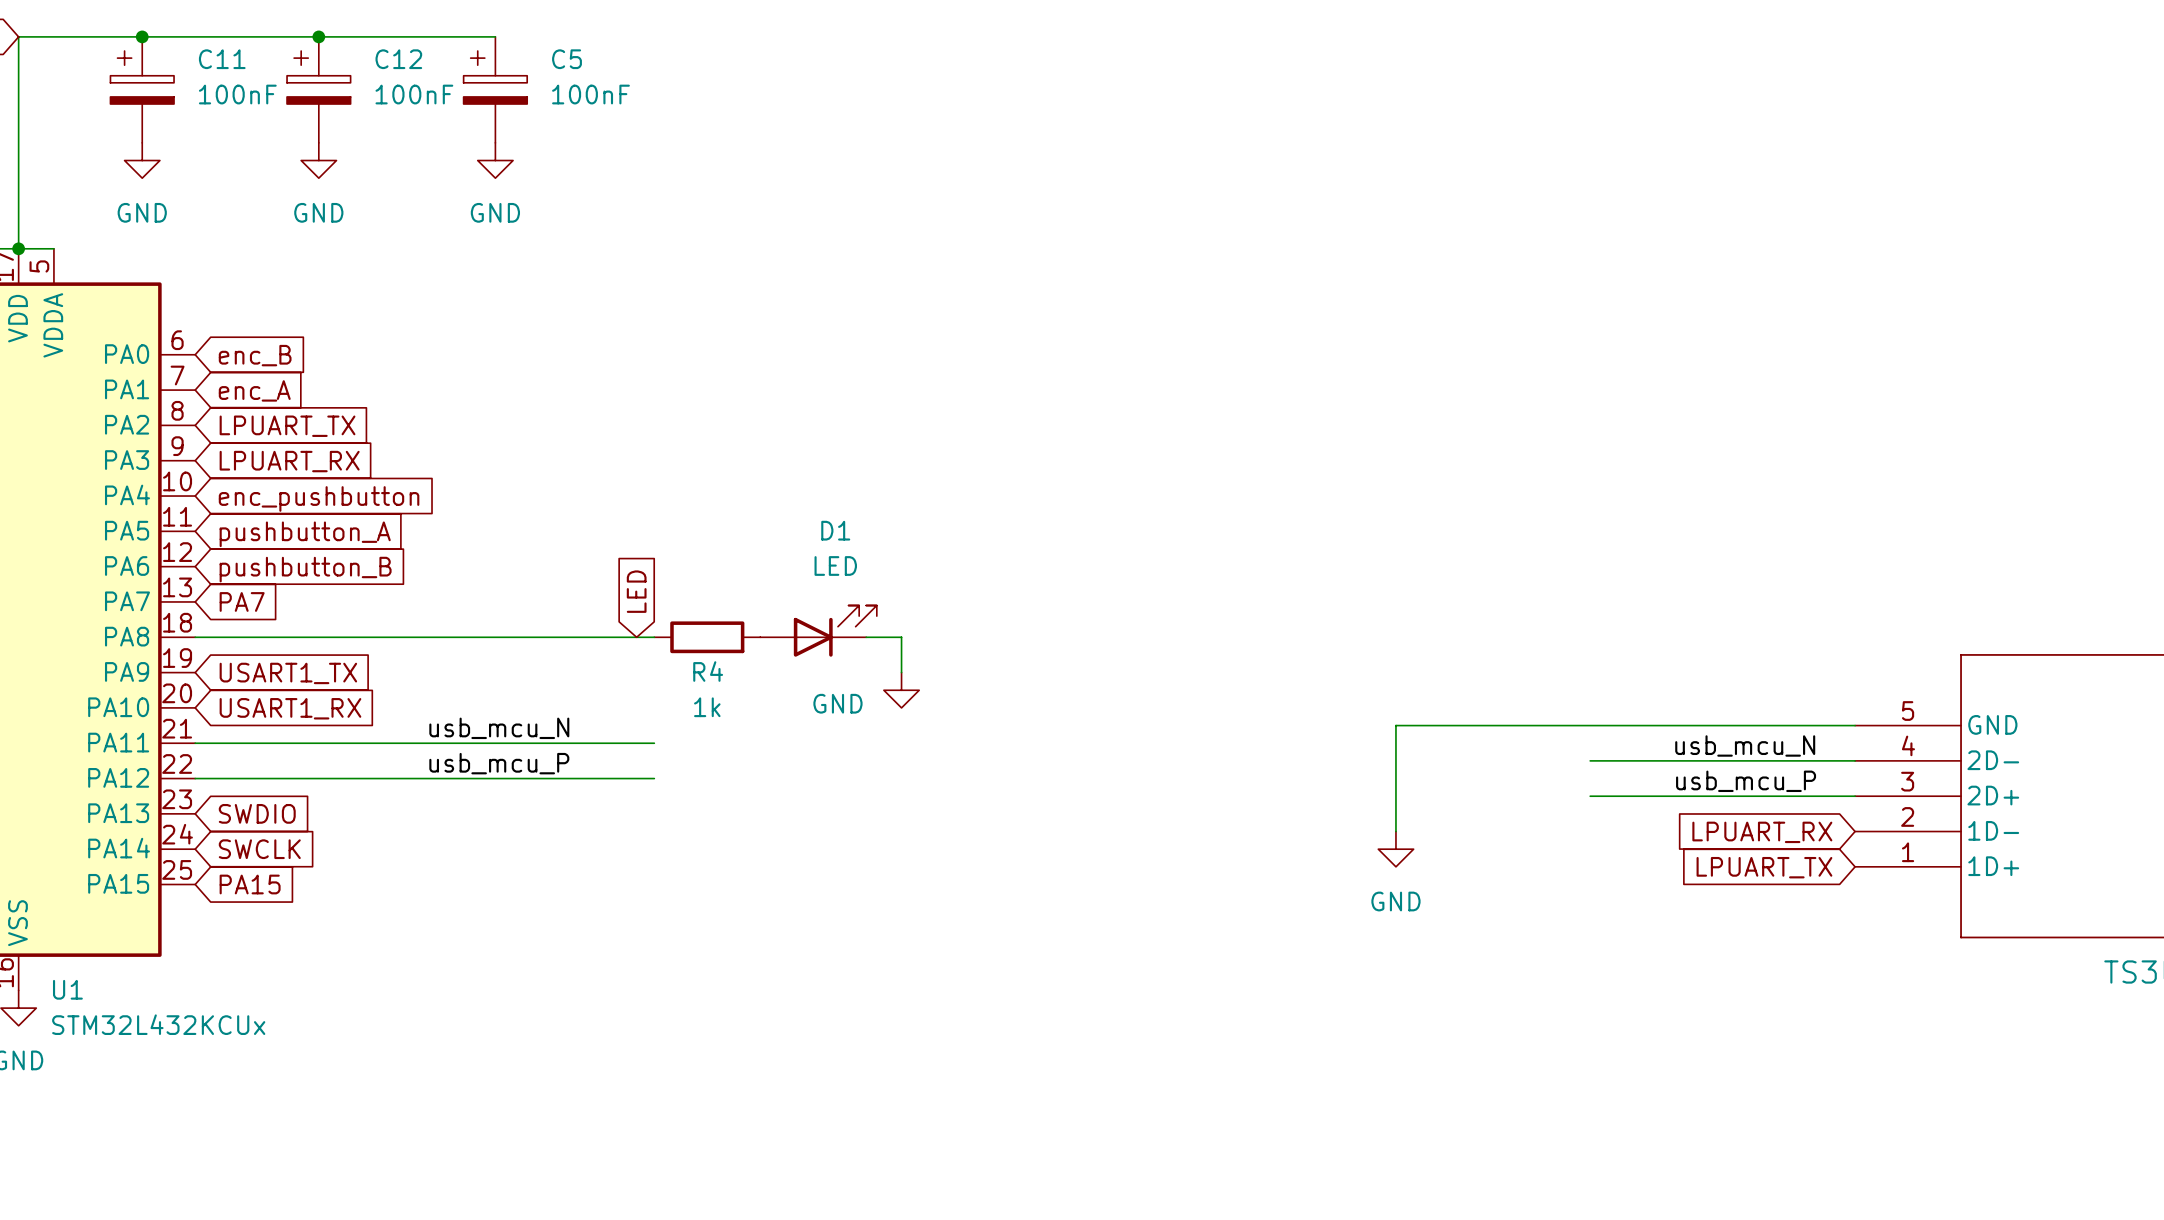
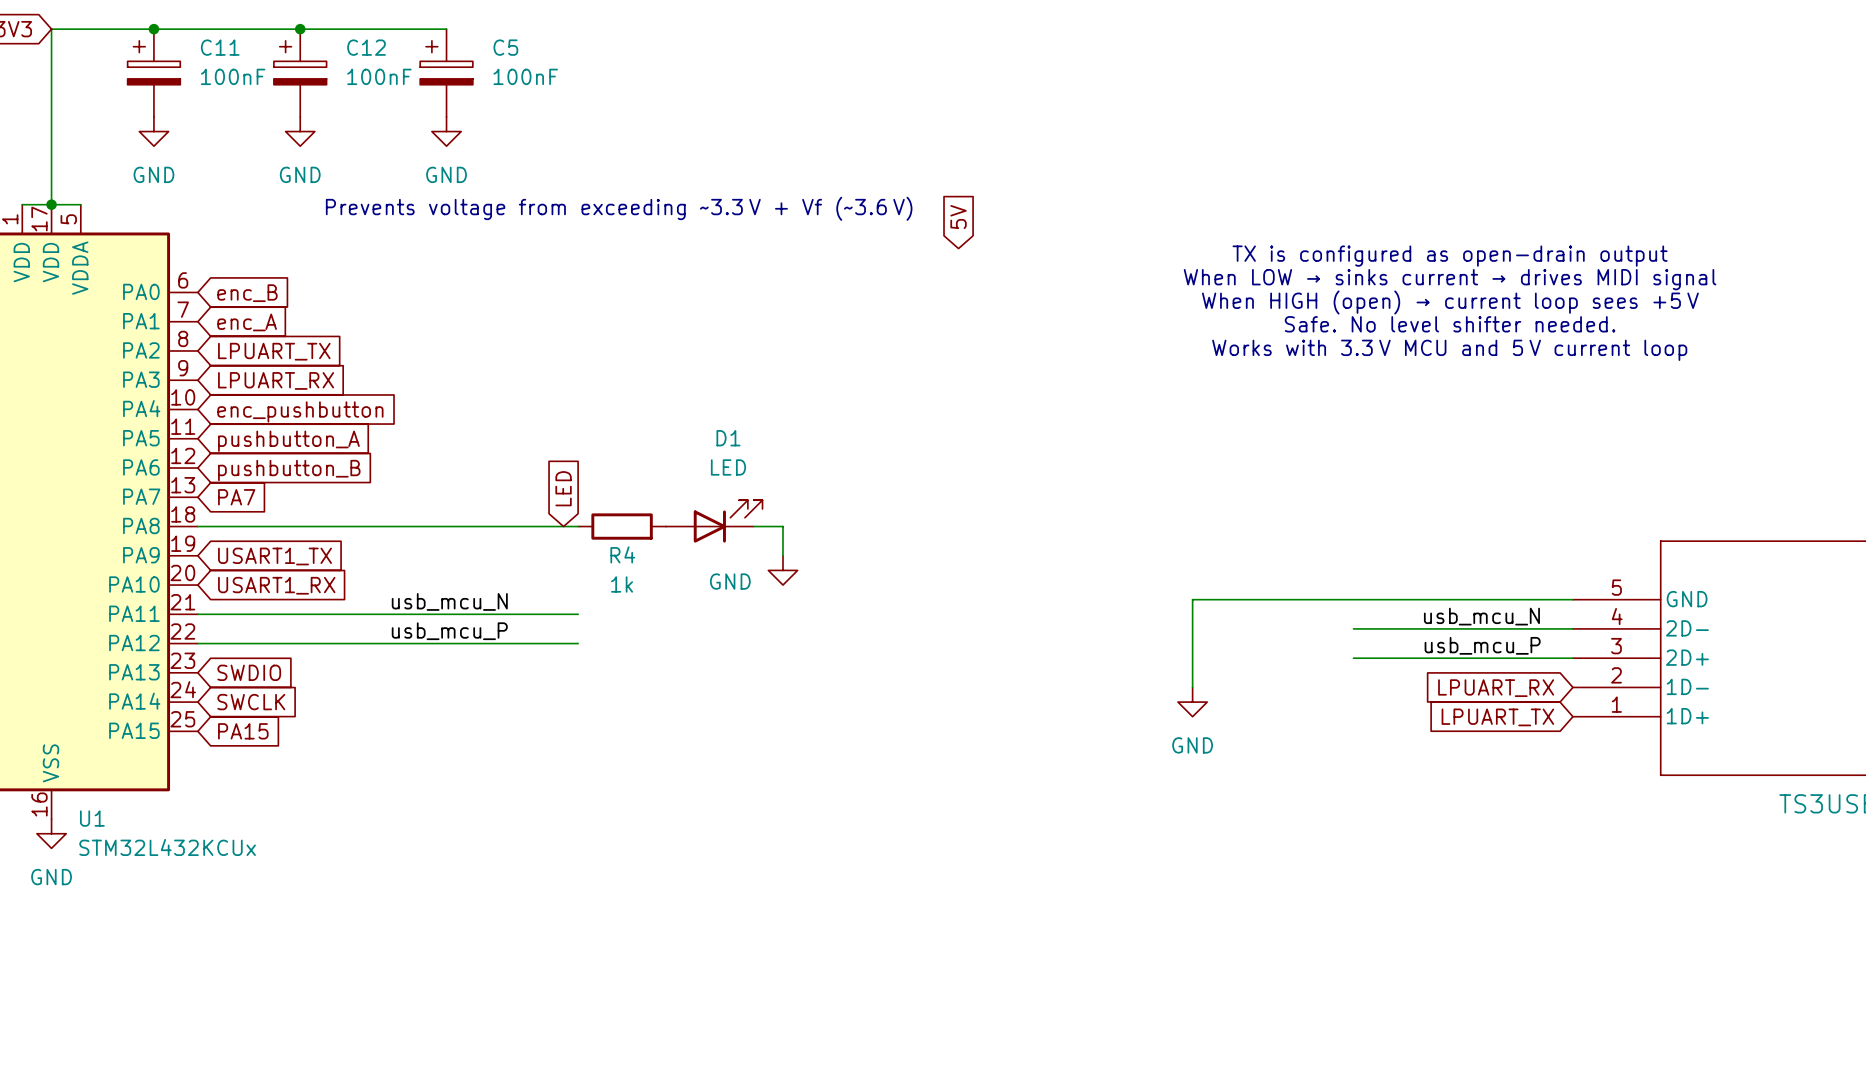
text: none -> Prevents voltage from exceeding ~3.3 V + Vf (~3.6 V) (619, 208)
global label: none -> 5V (958, 217)
text: none -> TX is configured as open-drain output (1450, 256)
text: none -> When LOW → sinks current → drives MIDI signal (1450, 279)
text: none -> When HIGH (open) → current loop sees +5 V (1450, 302)
text: none -> Safe. No level shifter needed. (1450, 324)
text: none -> Works with 3.3 V MCU and 5 V current loop (1449, 350)

